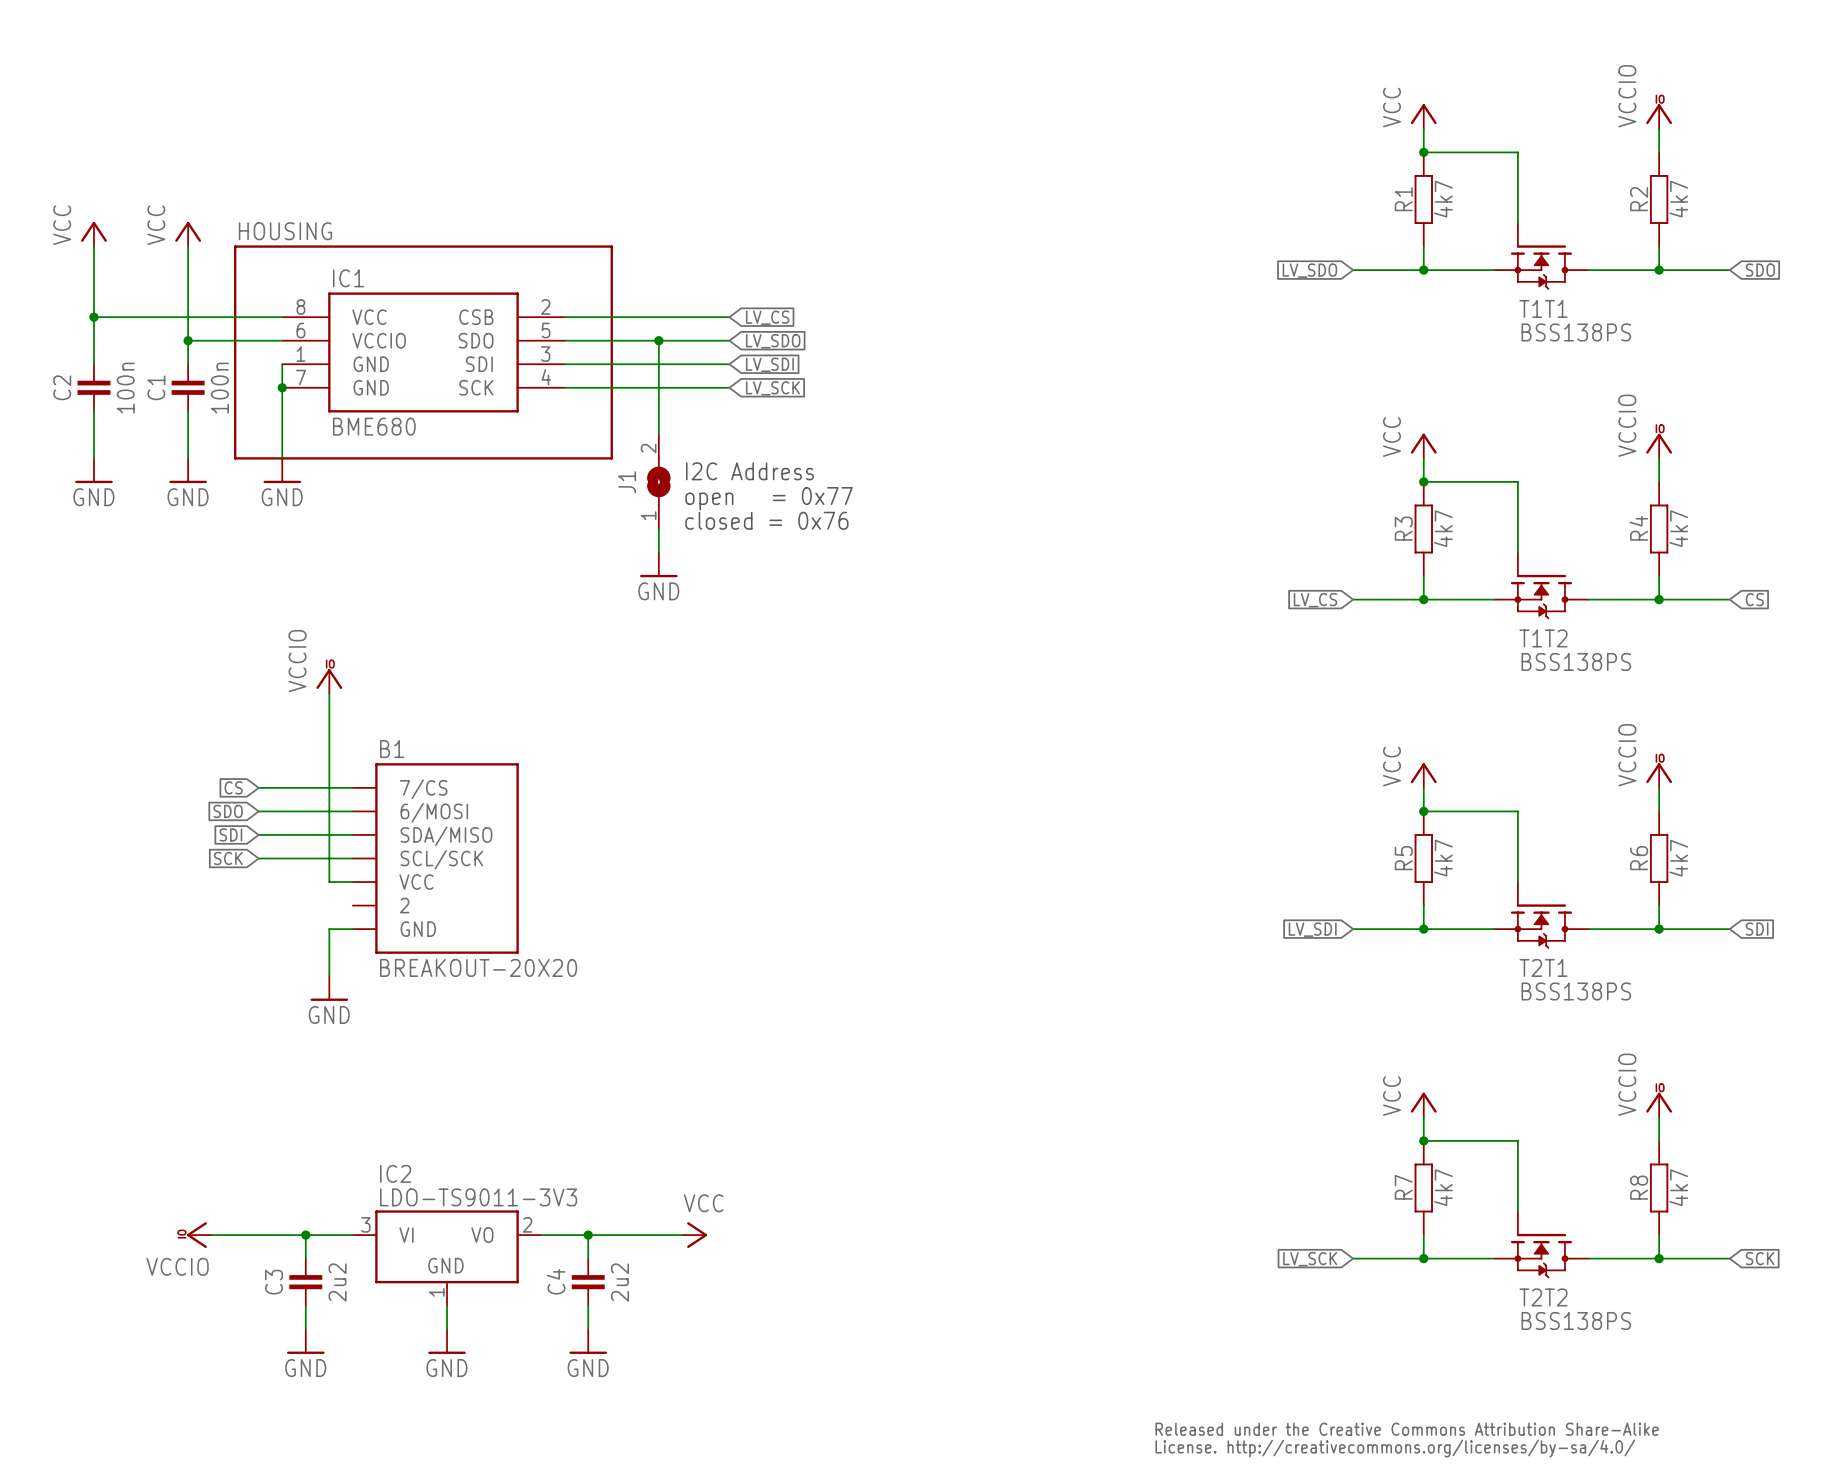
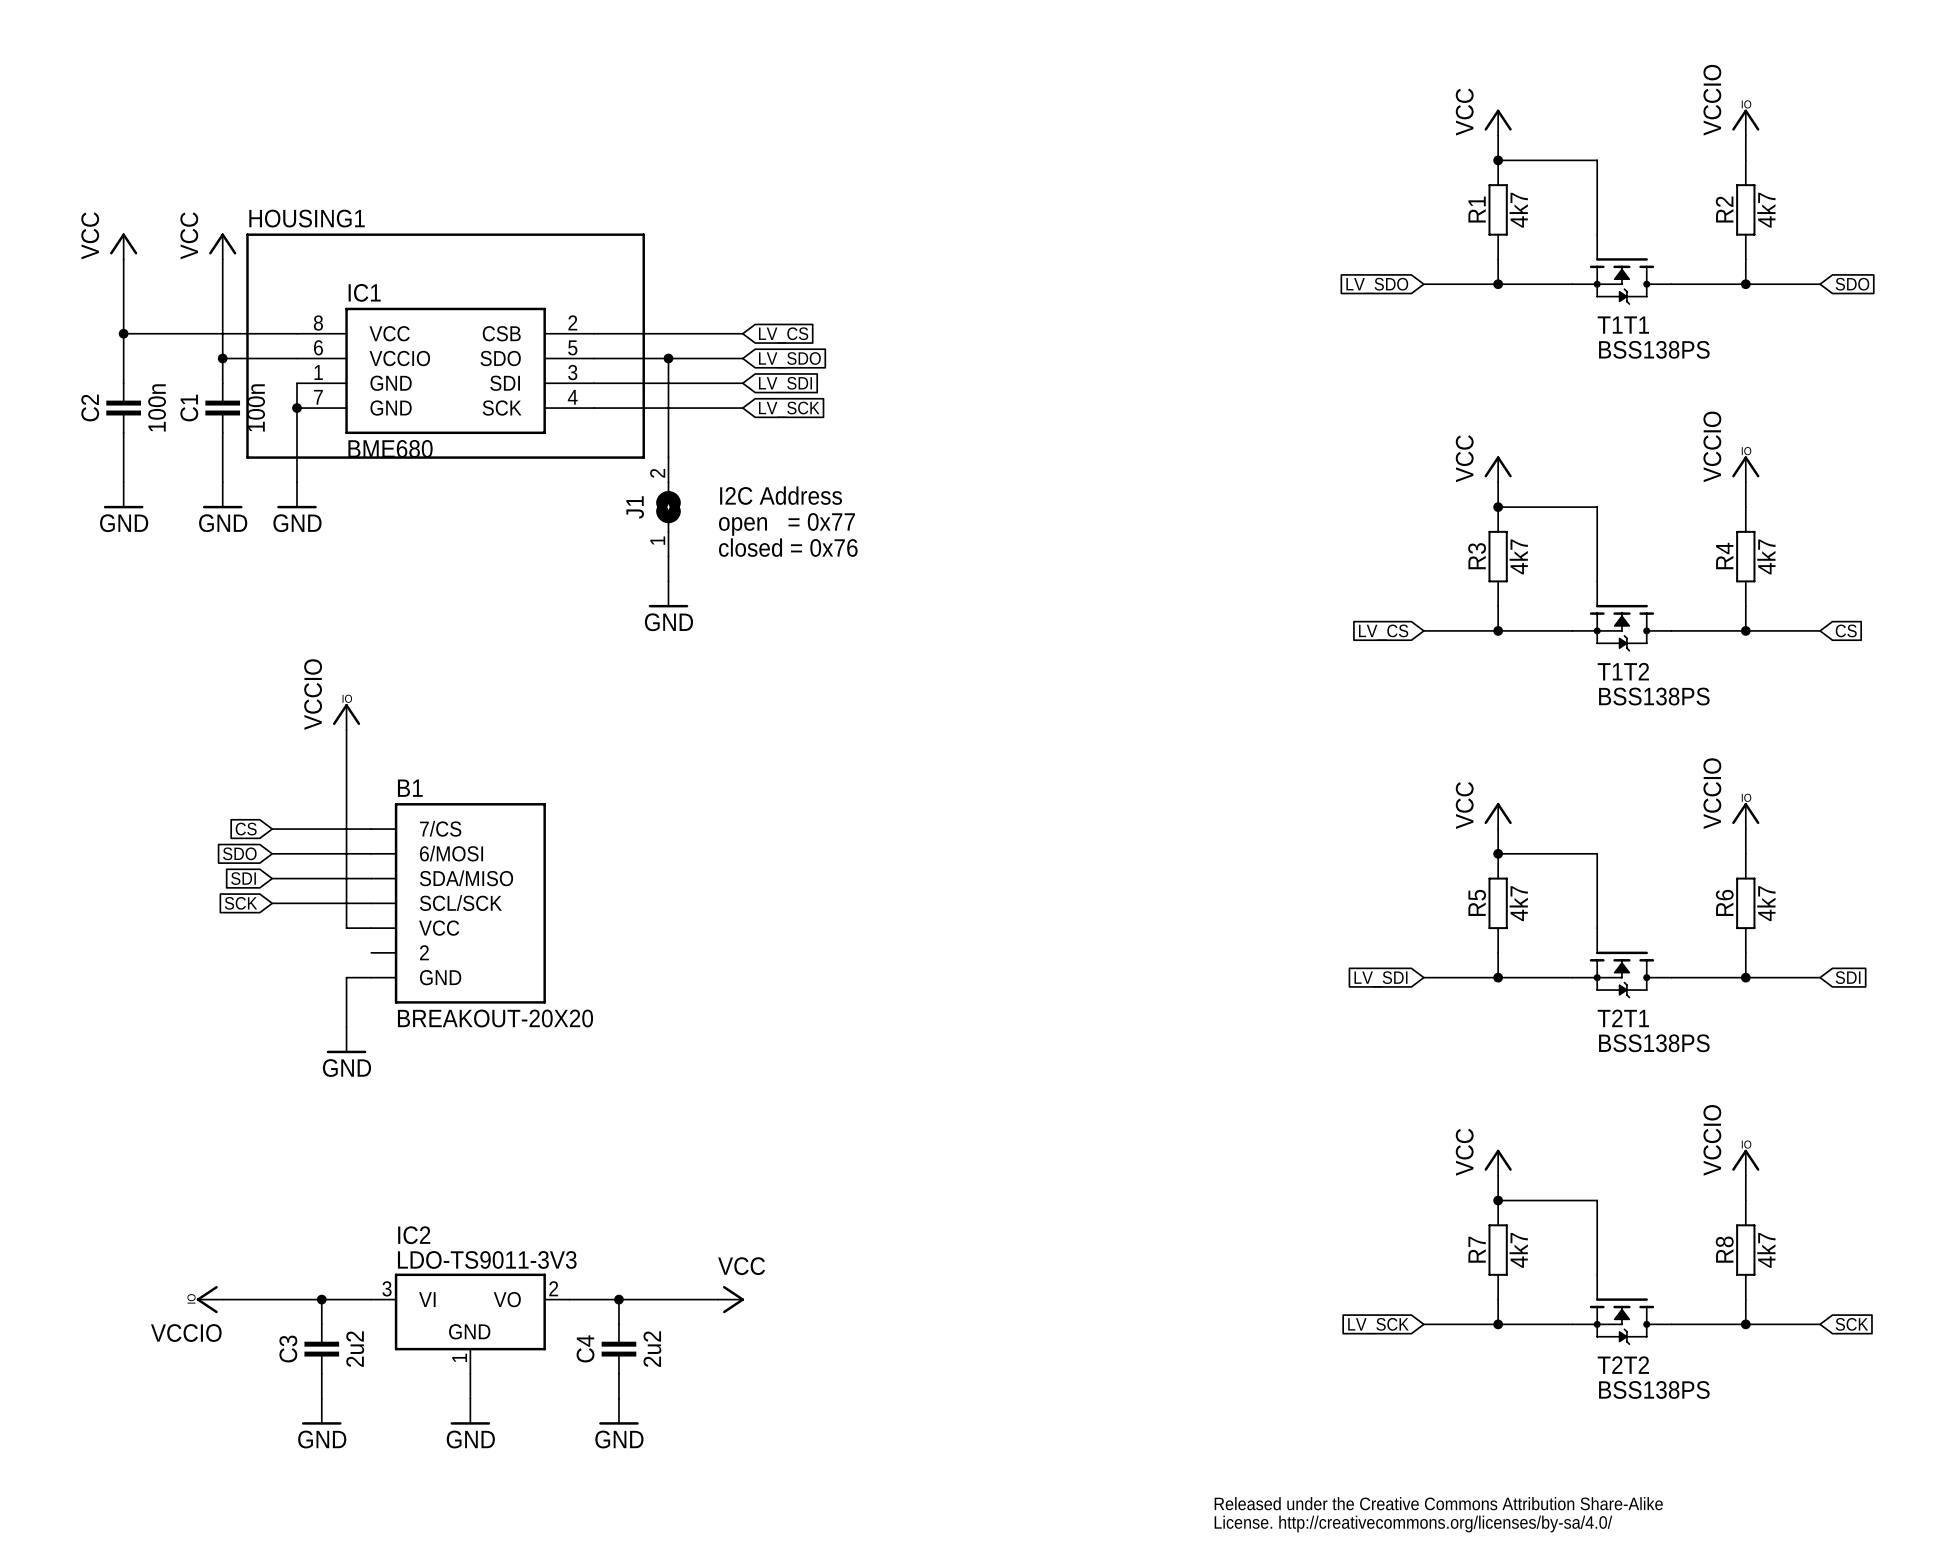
power symbol position: VCC (93, 234) -> VCC (123, 246)
power symbol position: VCC (188, 234) -> VCC (222, 246)
wire: (93, 246) (93, 364) -> (123, 259) (123, 383)
wire: (188, 246) (188, 364) -> (222, 259) (222, 383)
wire: (93, 317) (117, 317) -> none
junction position: (93, 317) -> (123, 333)
wire: (705, 317) (729, 317) -> none
global label position: LV_CS (767, 317) -> LV_CS (783, 335)
HOUSING1: none -> (445, 346)
wire: (188, 340) (211, 340) -> none
junction position: (188, 340) -> (222, 358)
wire: (658, 340) (658, 434) -> (668, 358) (668, 457)
junction position: (658, 340) -> (668, 358)
wire: (705, 340) (729, 340) -> none
global label position: LV_SDO (773, 341) -> LV_SDO (789, 360)
HOUSING: (423, 352) -> none
wire: (705, 364) (729, 364) -> none
global label position: LV_SDI (769, 364) -> LV_SDI (785, 384)
C2 position: (93, 387) -> (123, 408)
C1 position: (188, 387) -> (222, 408)
wire: (705, 387) (729, 387) -> none
global label position: LV_SCK (772, 388) -> LV_SCK (789, 409)
wire: (93, 411) (93, 458) -> (123, 432) (123, 482)
wire: (188, 411) (188, 458) -> (222, 432) (222, 482)
power symbol position: GND (93, 470) -> GND (123, 495)
power symbol position: GND (188, 470) -> GND (222, 495)
J1 position: (658, 481) -> (668, 507)
wire: (658, 528) (658, 552) -> (668, 556) (668, 581)
power symbol position: GND (658, 564) -> GND (668, 594)

